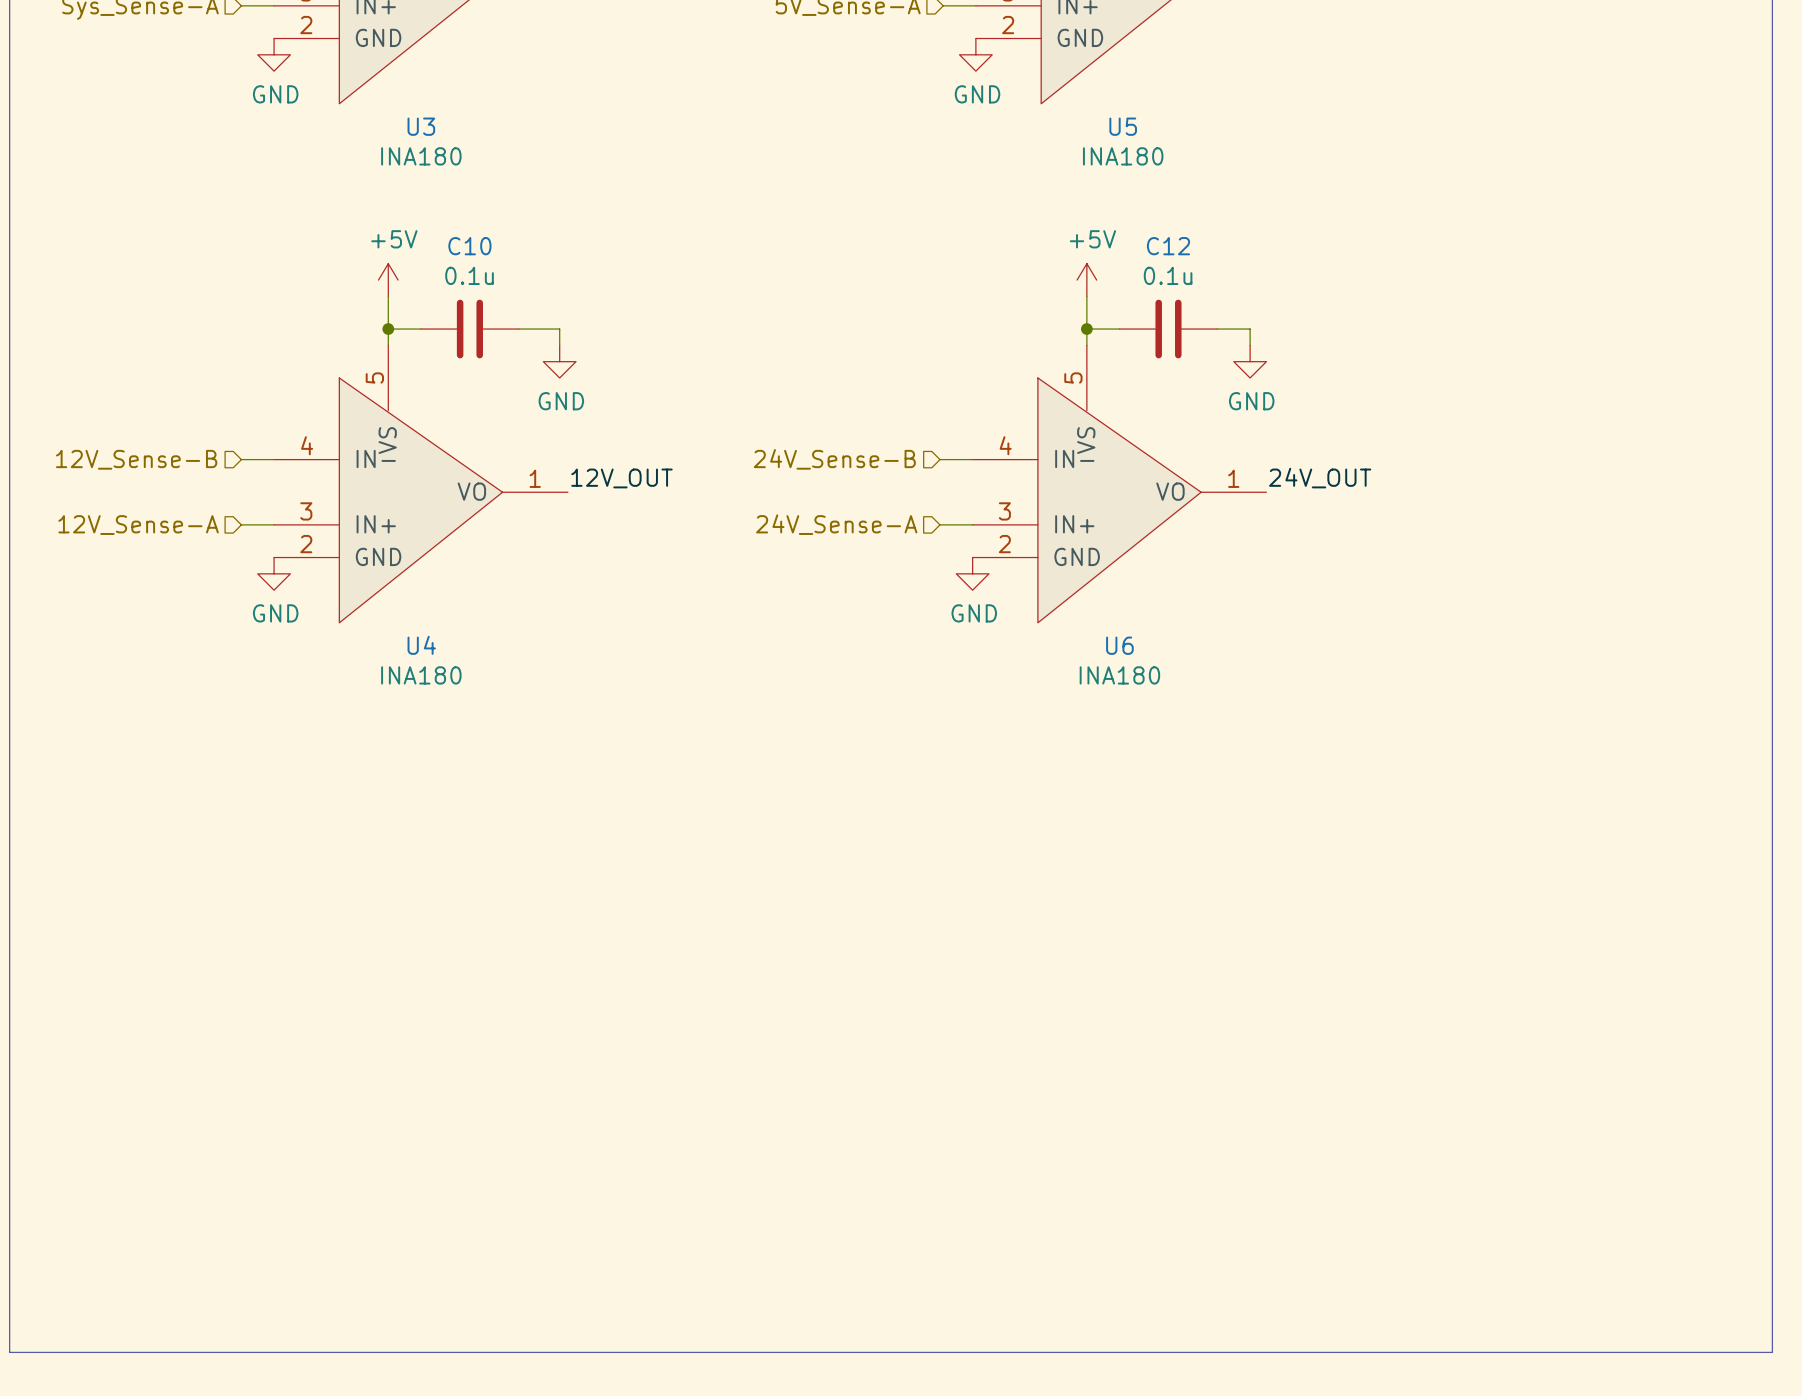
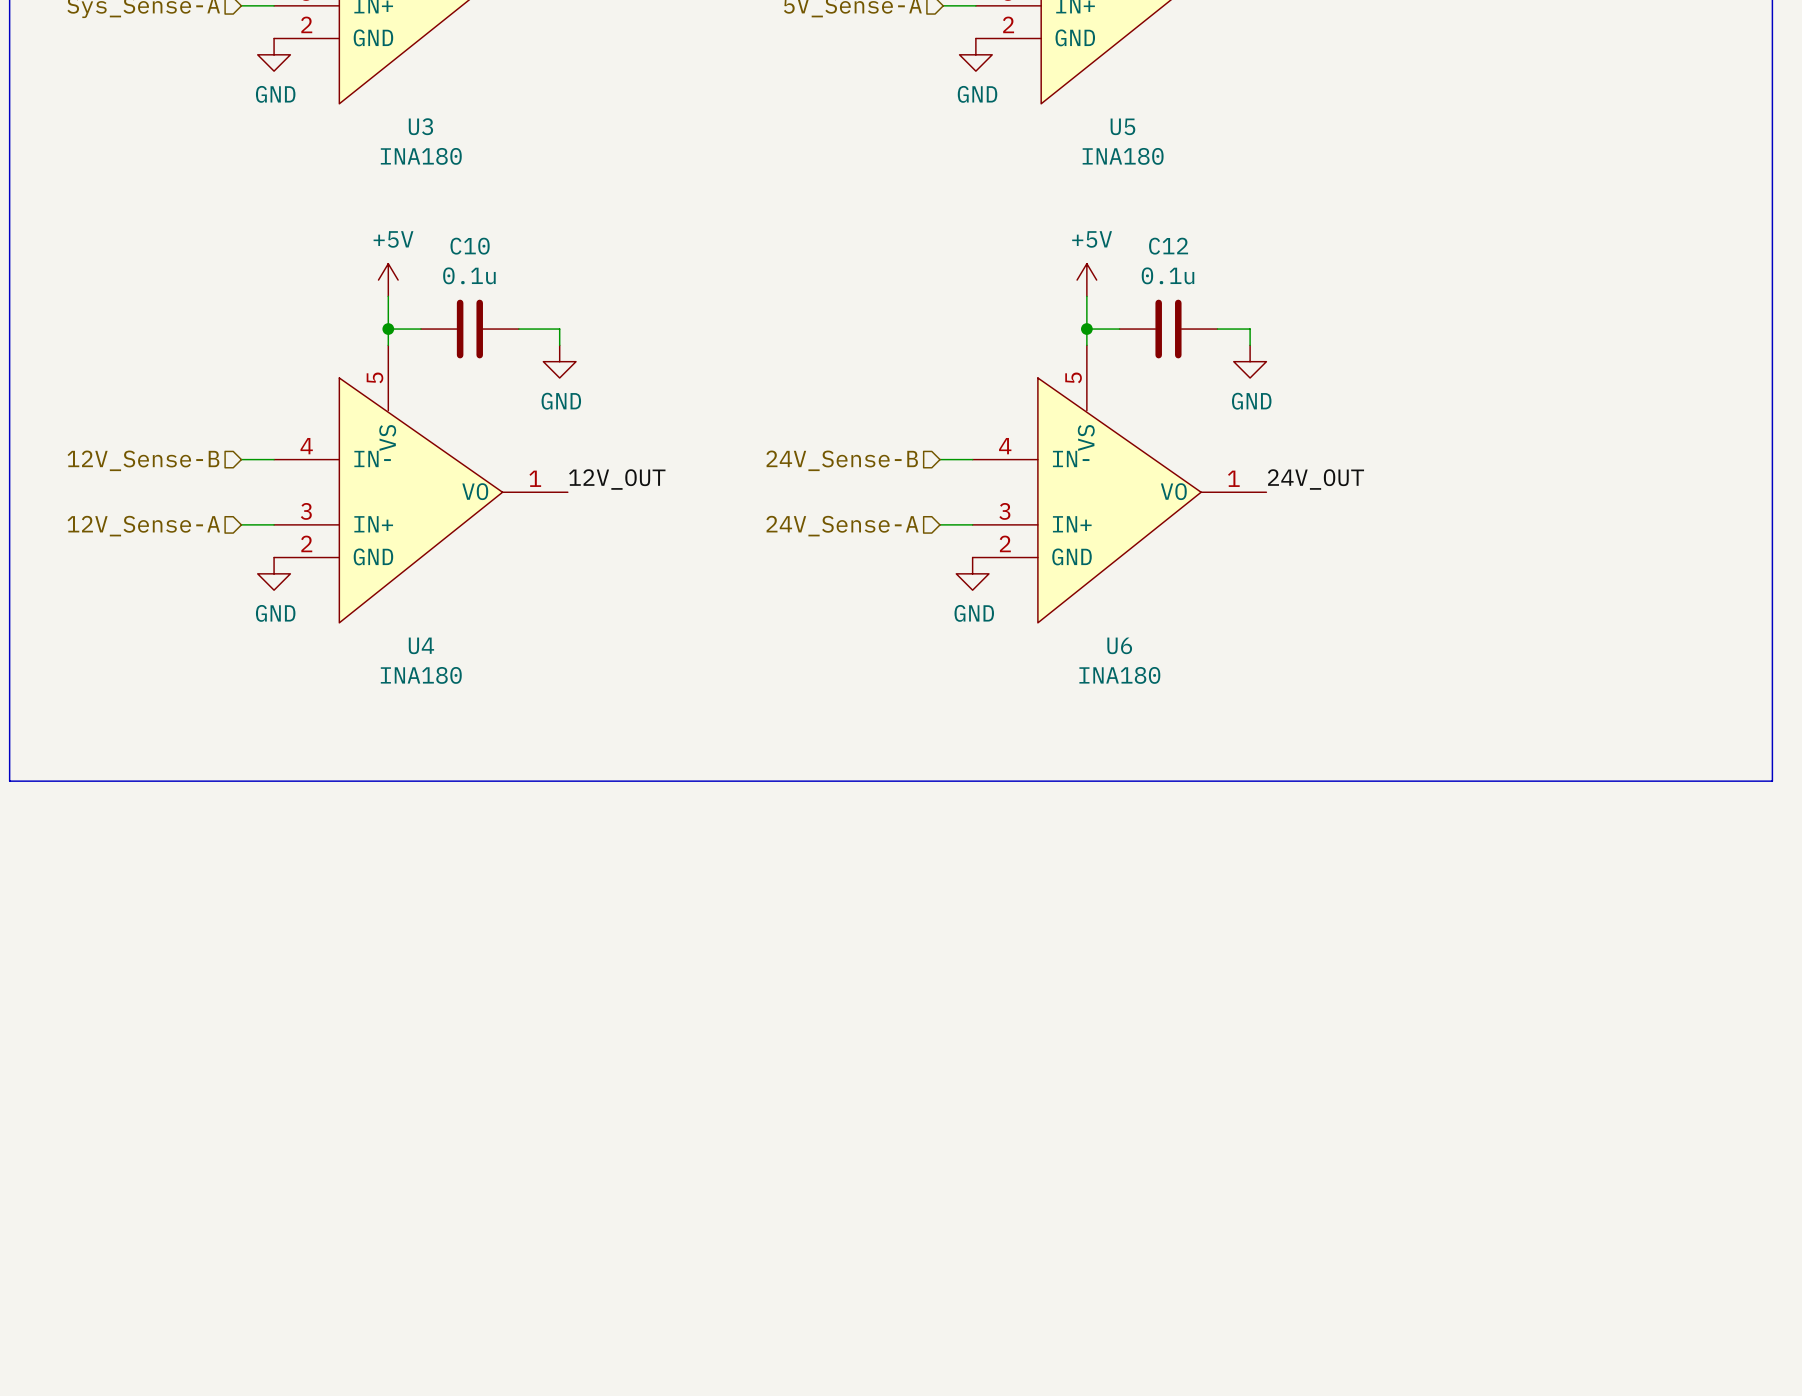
line: (9, 781) (9, 1352) (1772, 1352) (1772, 781) -> (9, 781) (1772, 781)

